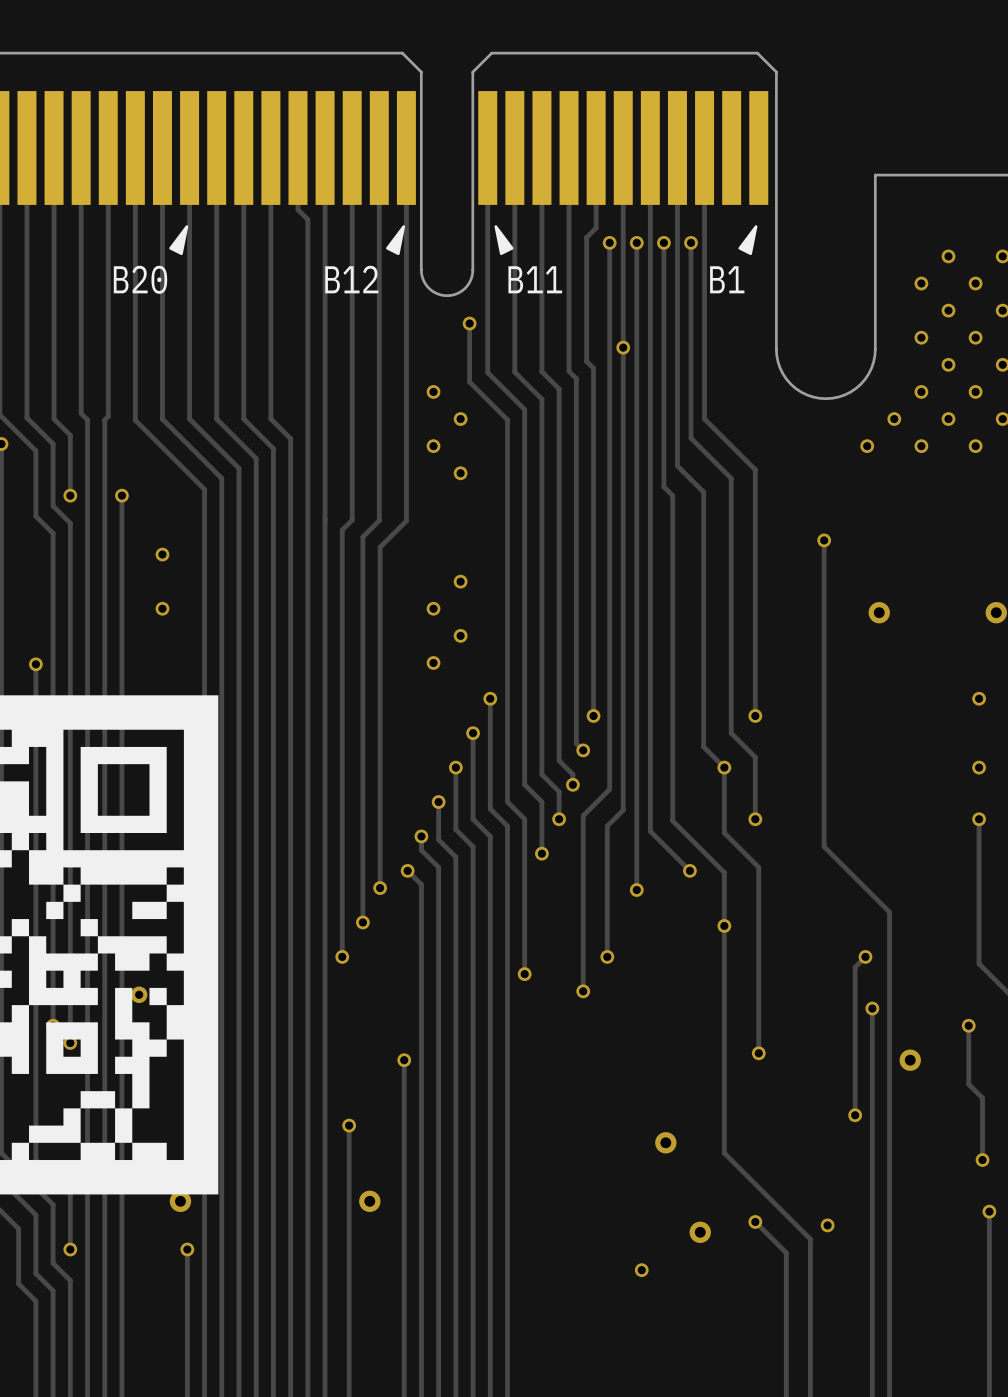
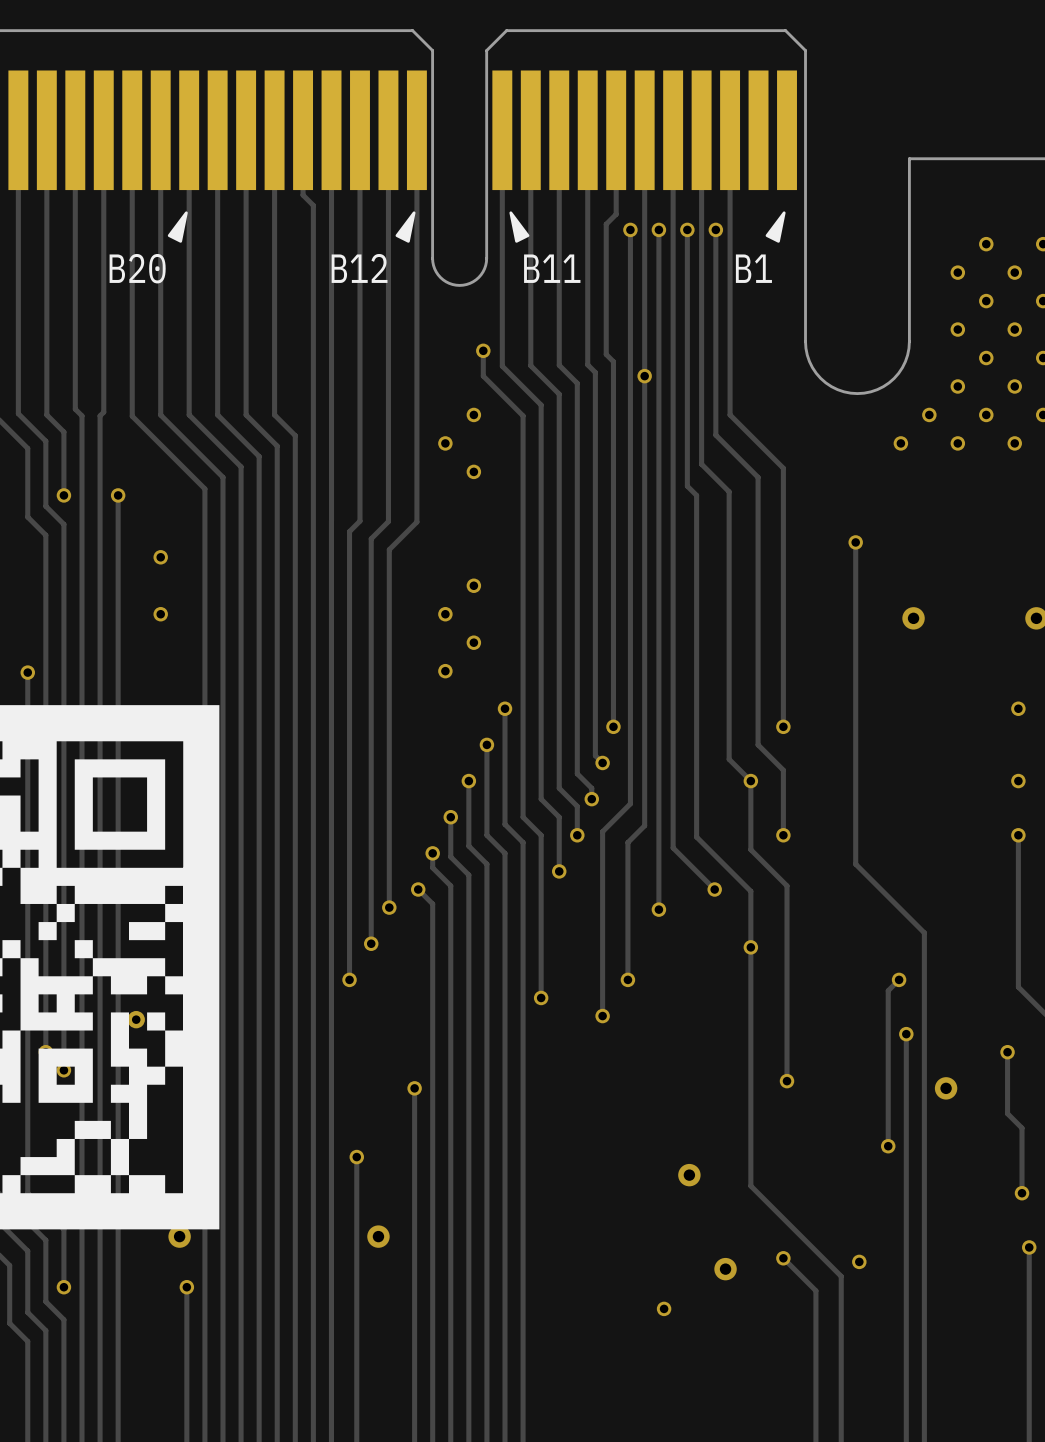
track: (469, 323) (469, 357) -> none
via: (469, 323) -> none
via position: (623, 347) -> (644, 376)
via: none -> (483, 350)
via: (433, 391) -> none

